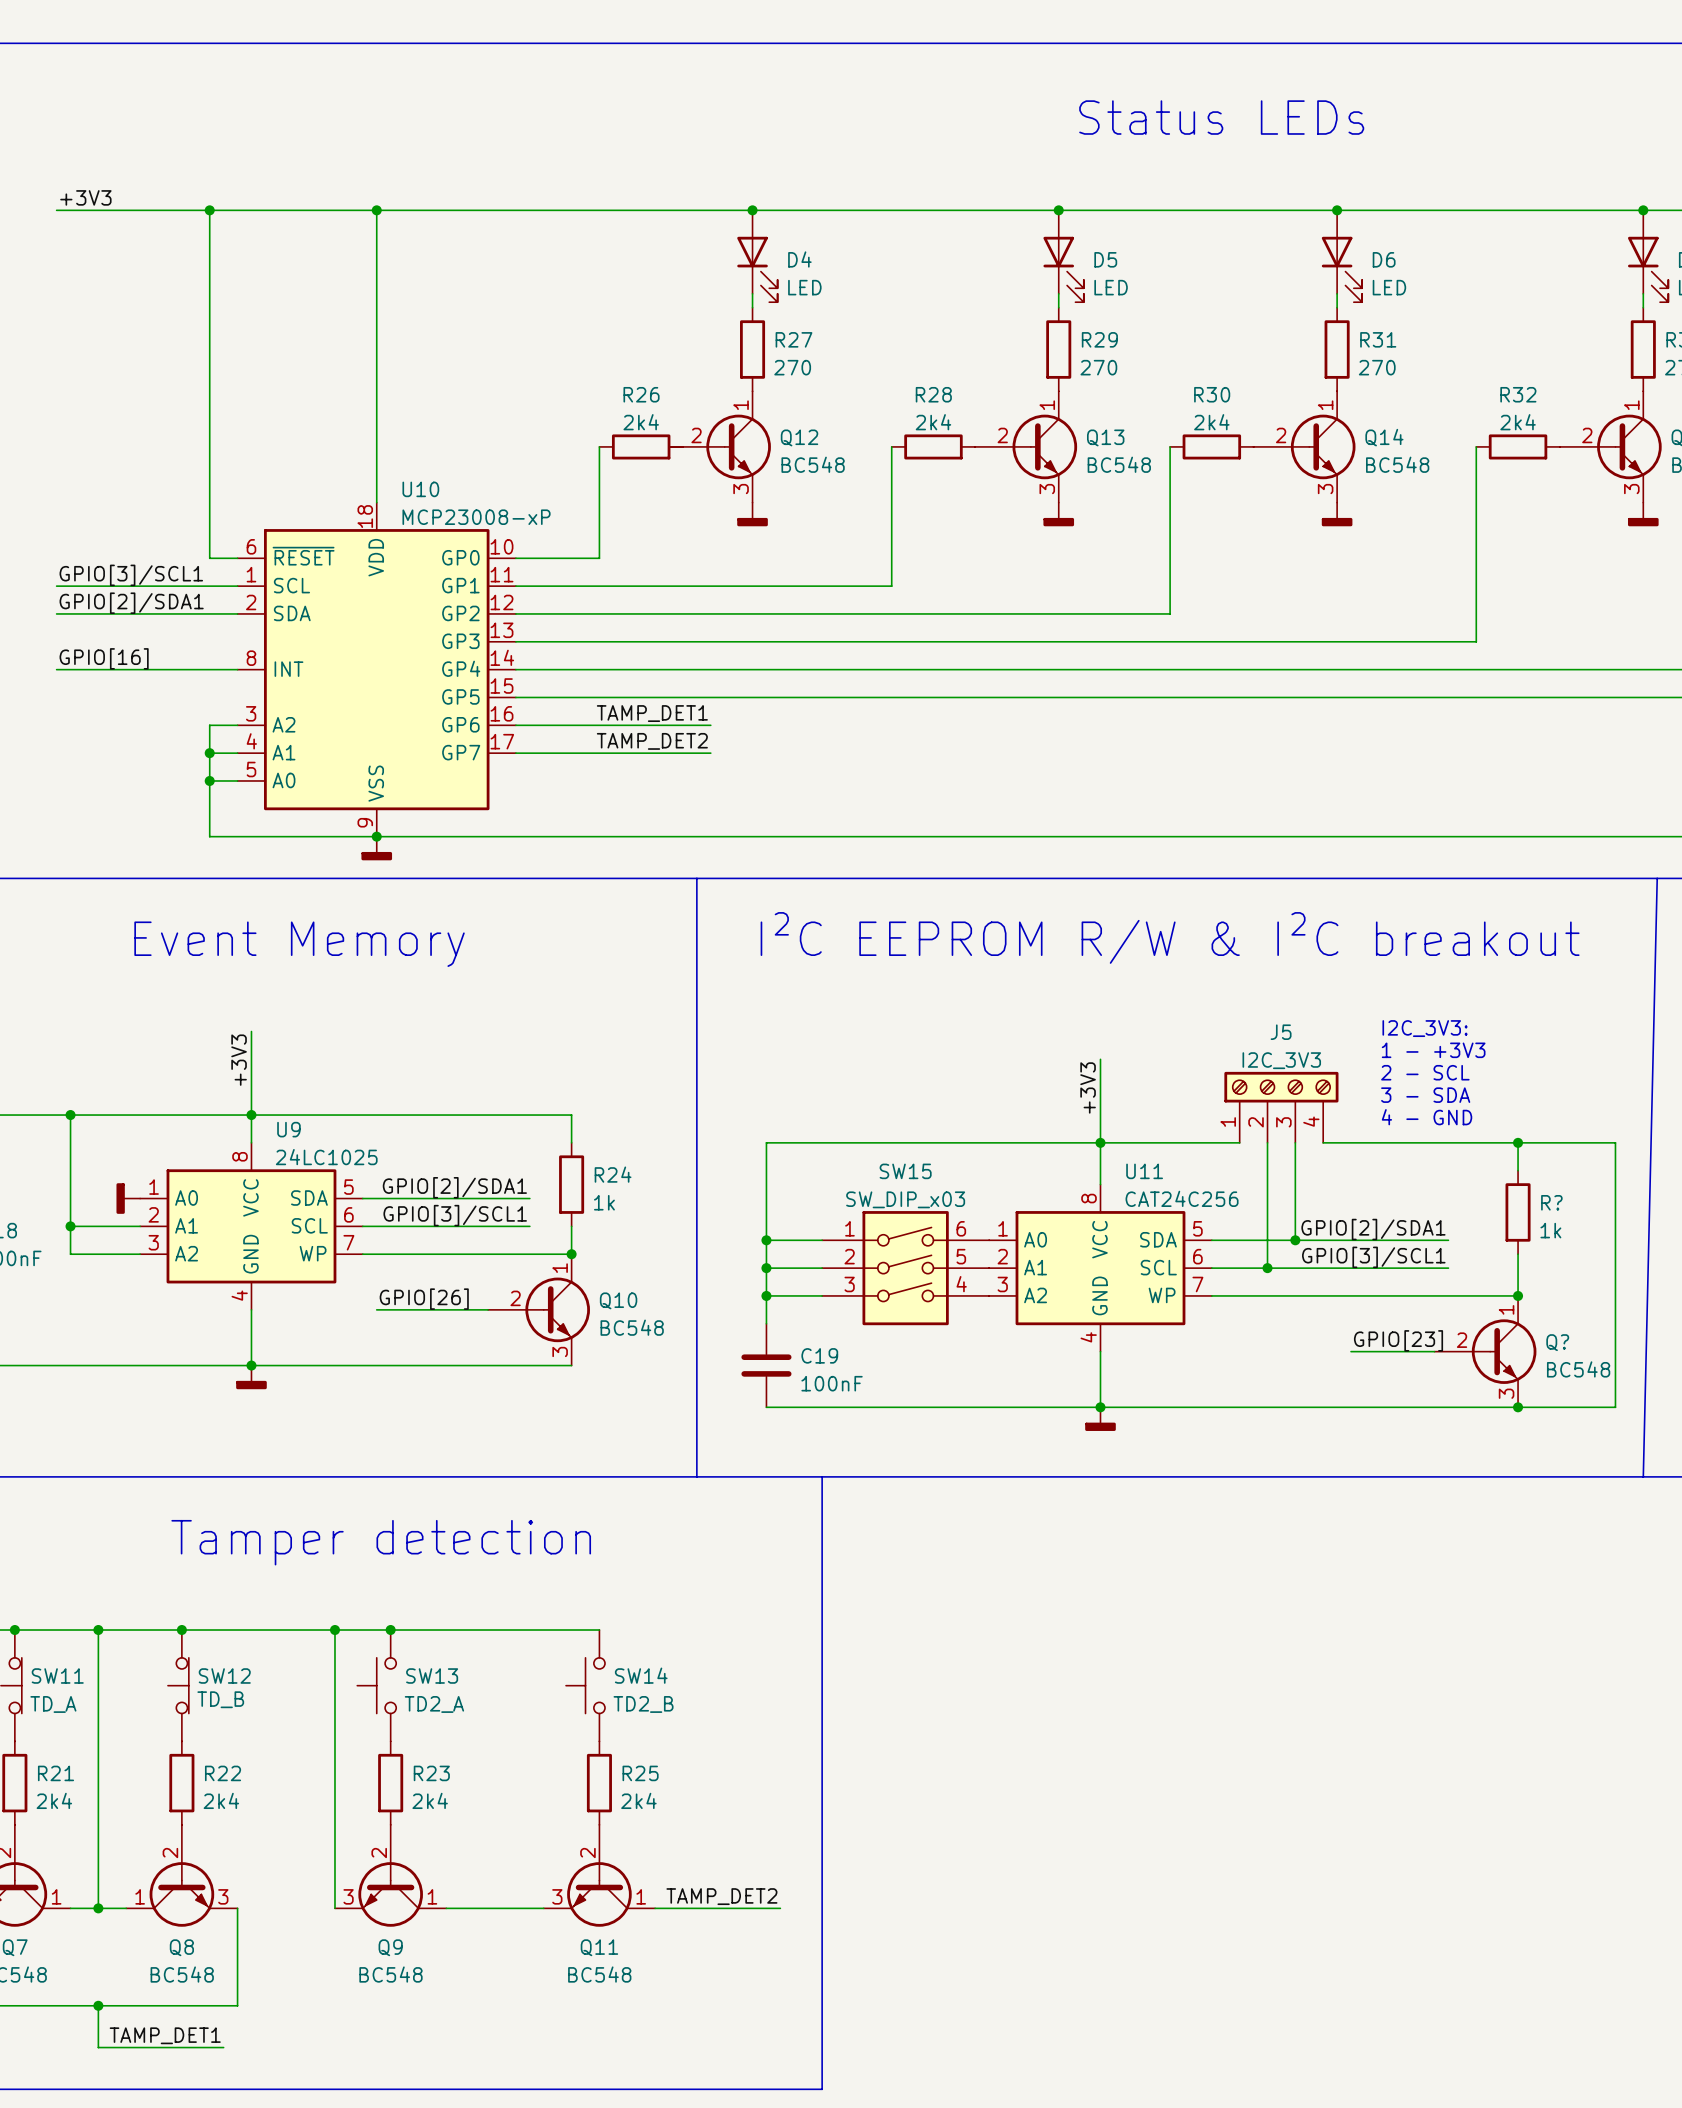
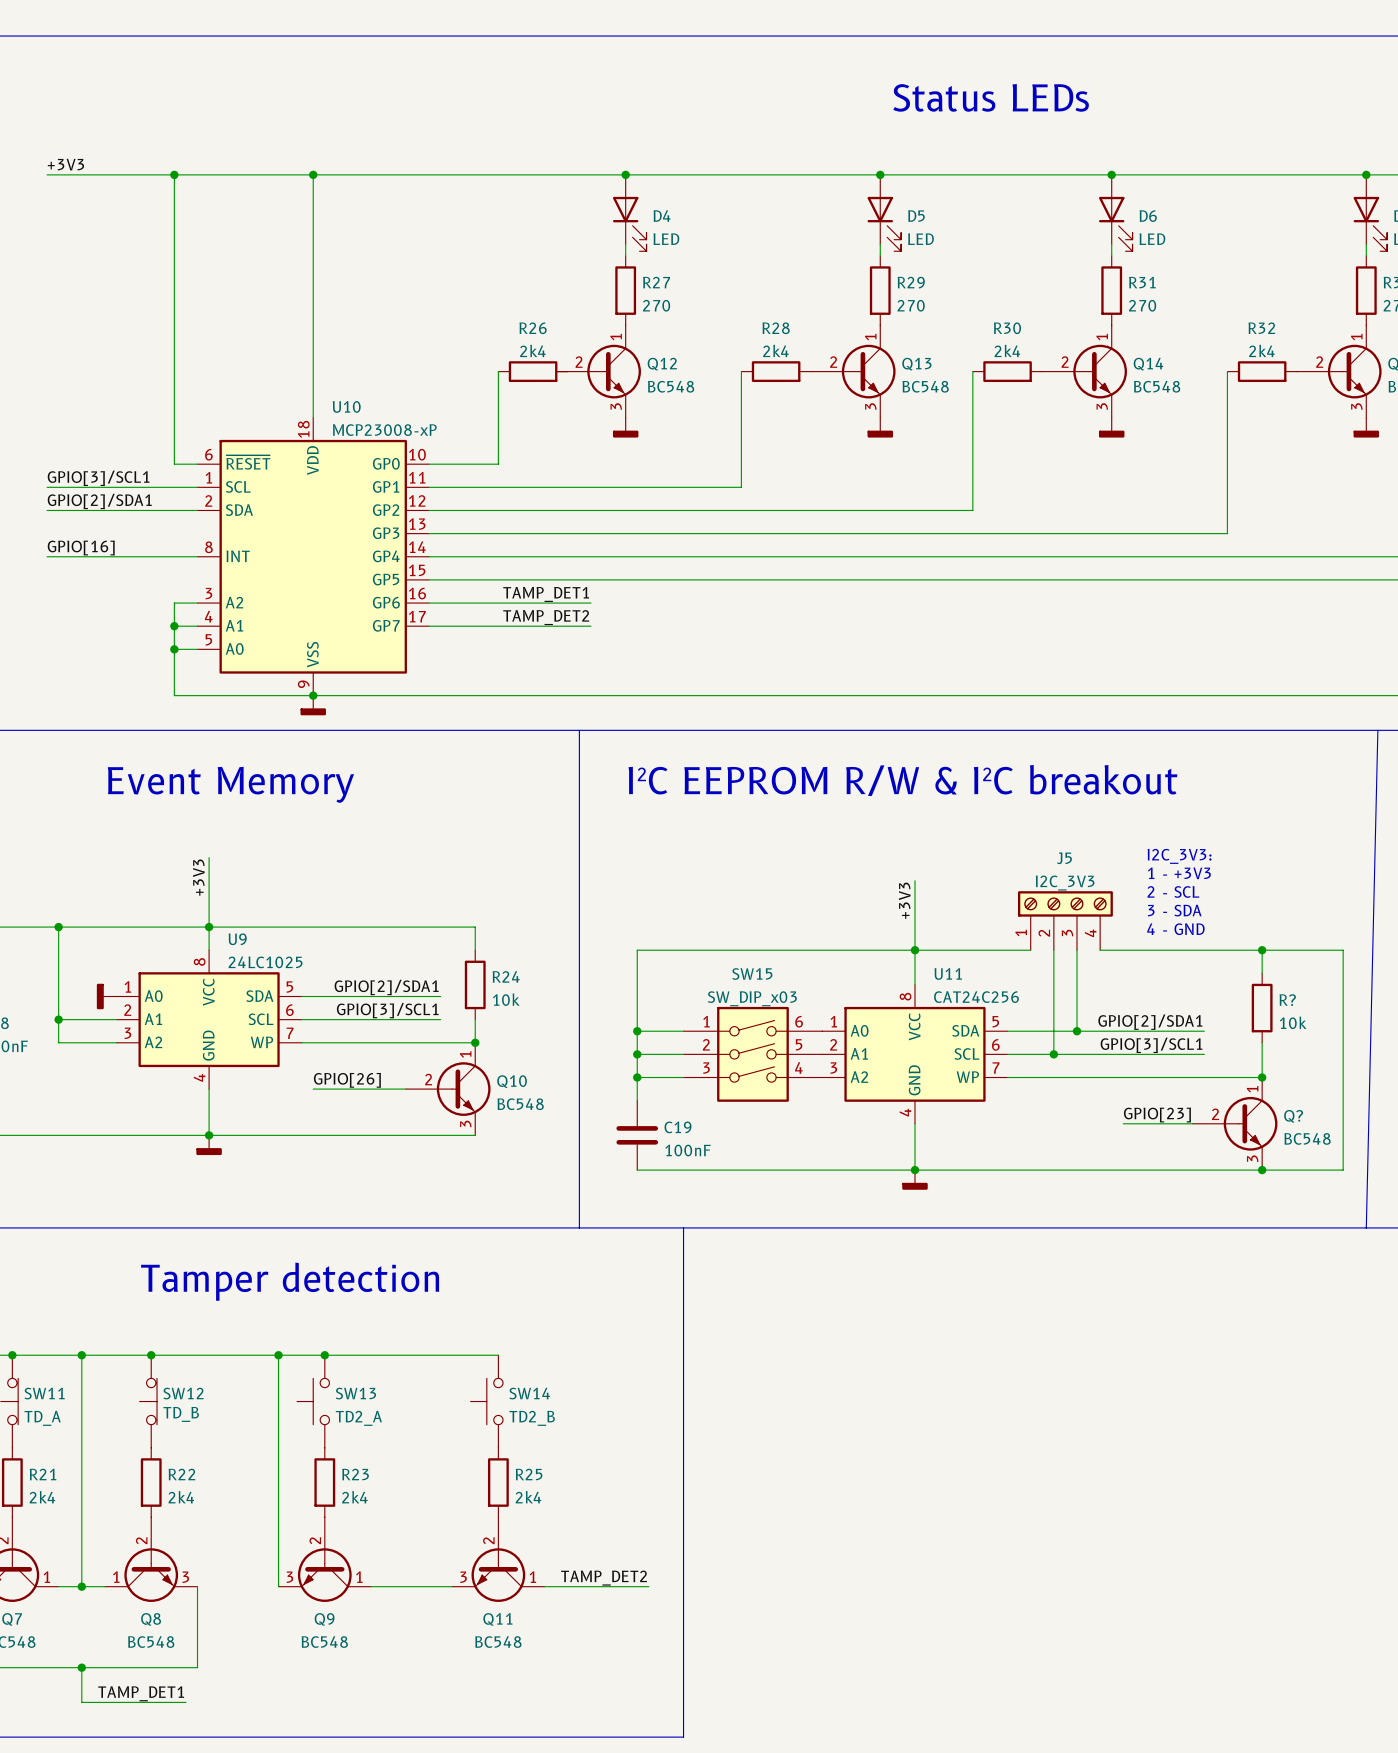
R24 value: 1k (604, 1202) -> 10k (506, 999)
R? value: 1k (1550, 1230) -> 10k (1293, 1022)

